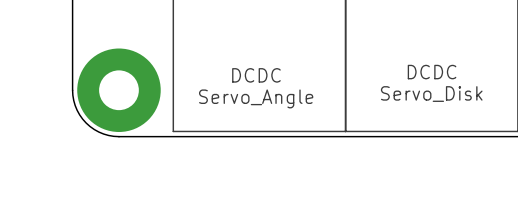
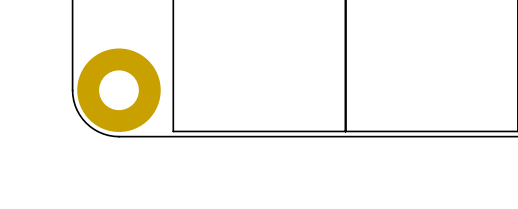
text: DCDC (432, 72) -> none
text: DCDC (256, 75) -> none
text: Servo_Disk (431, 94) -> none
text: Servo_Angle (256, 98) -> none

